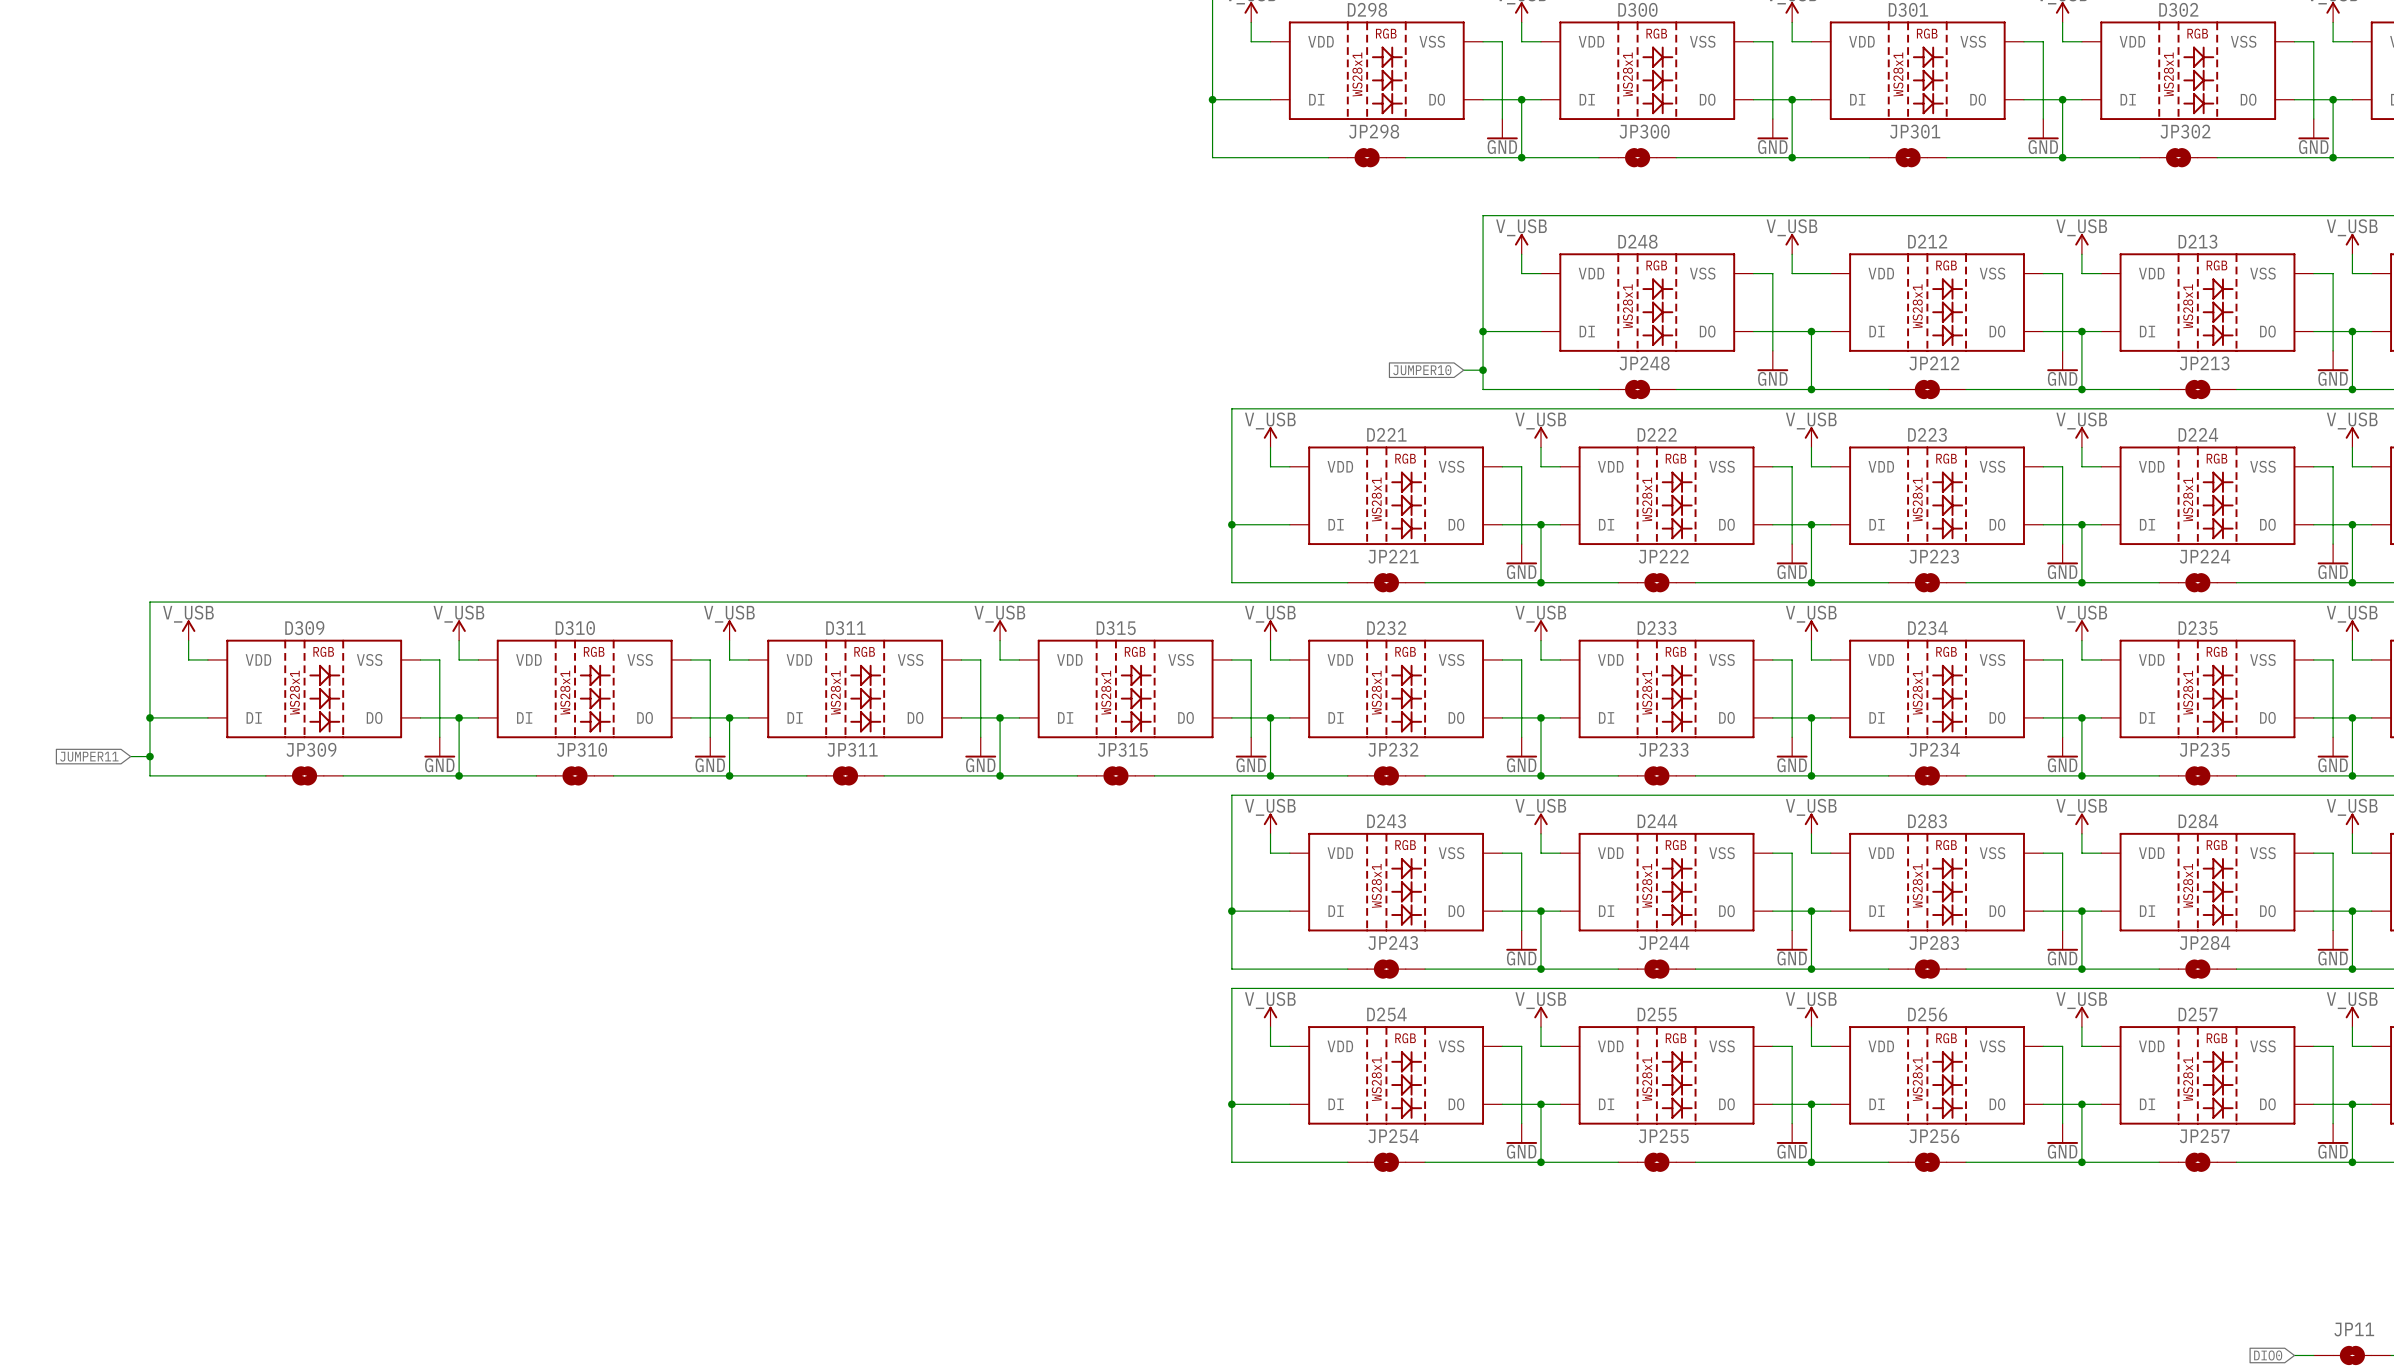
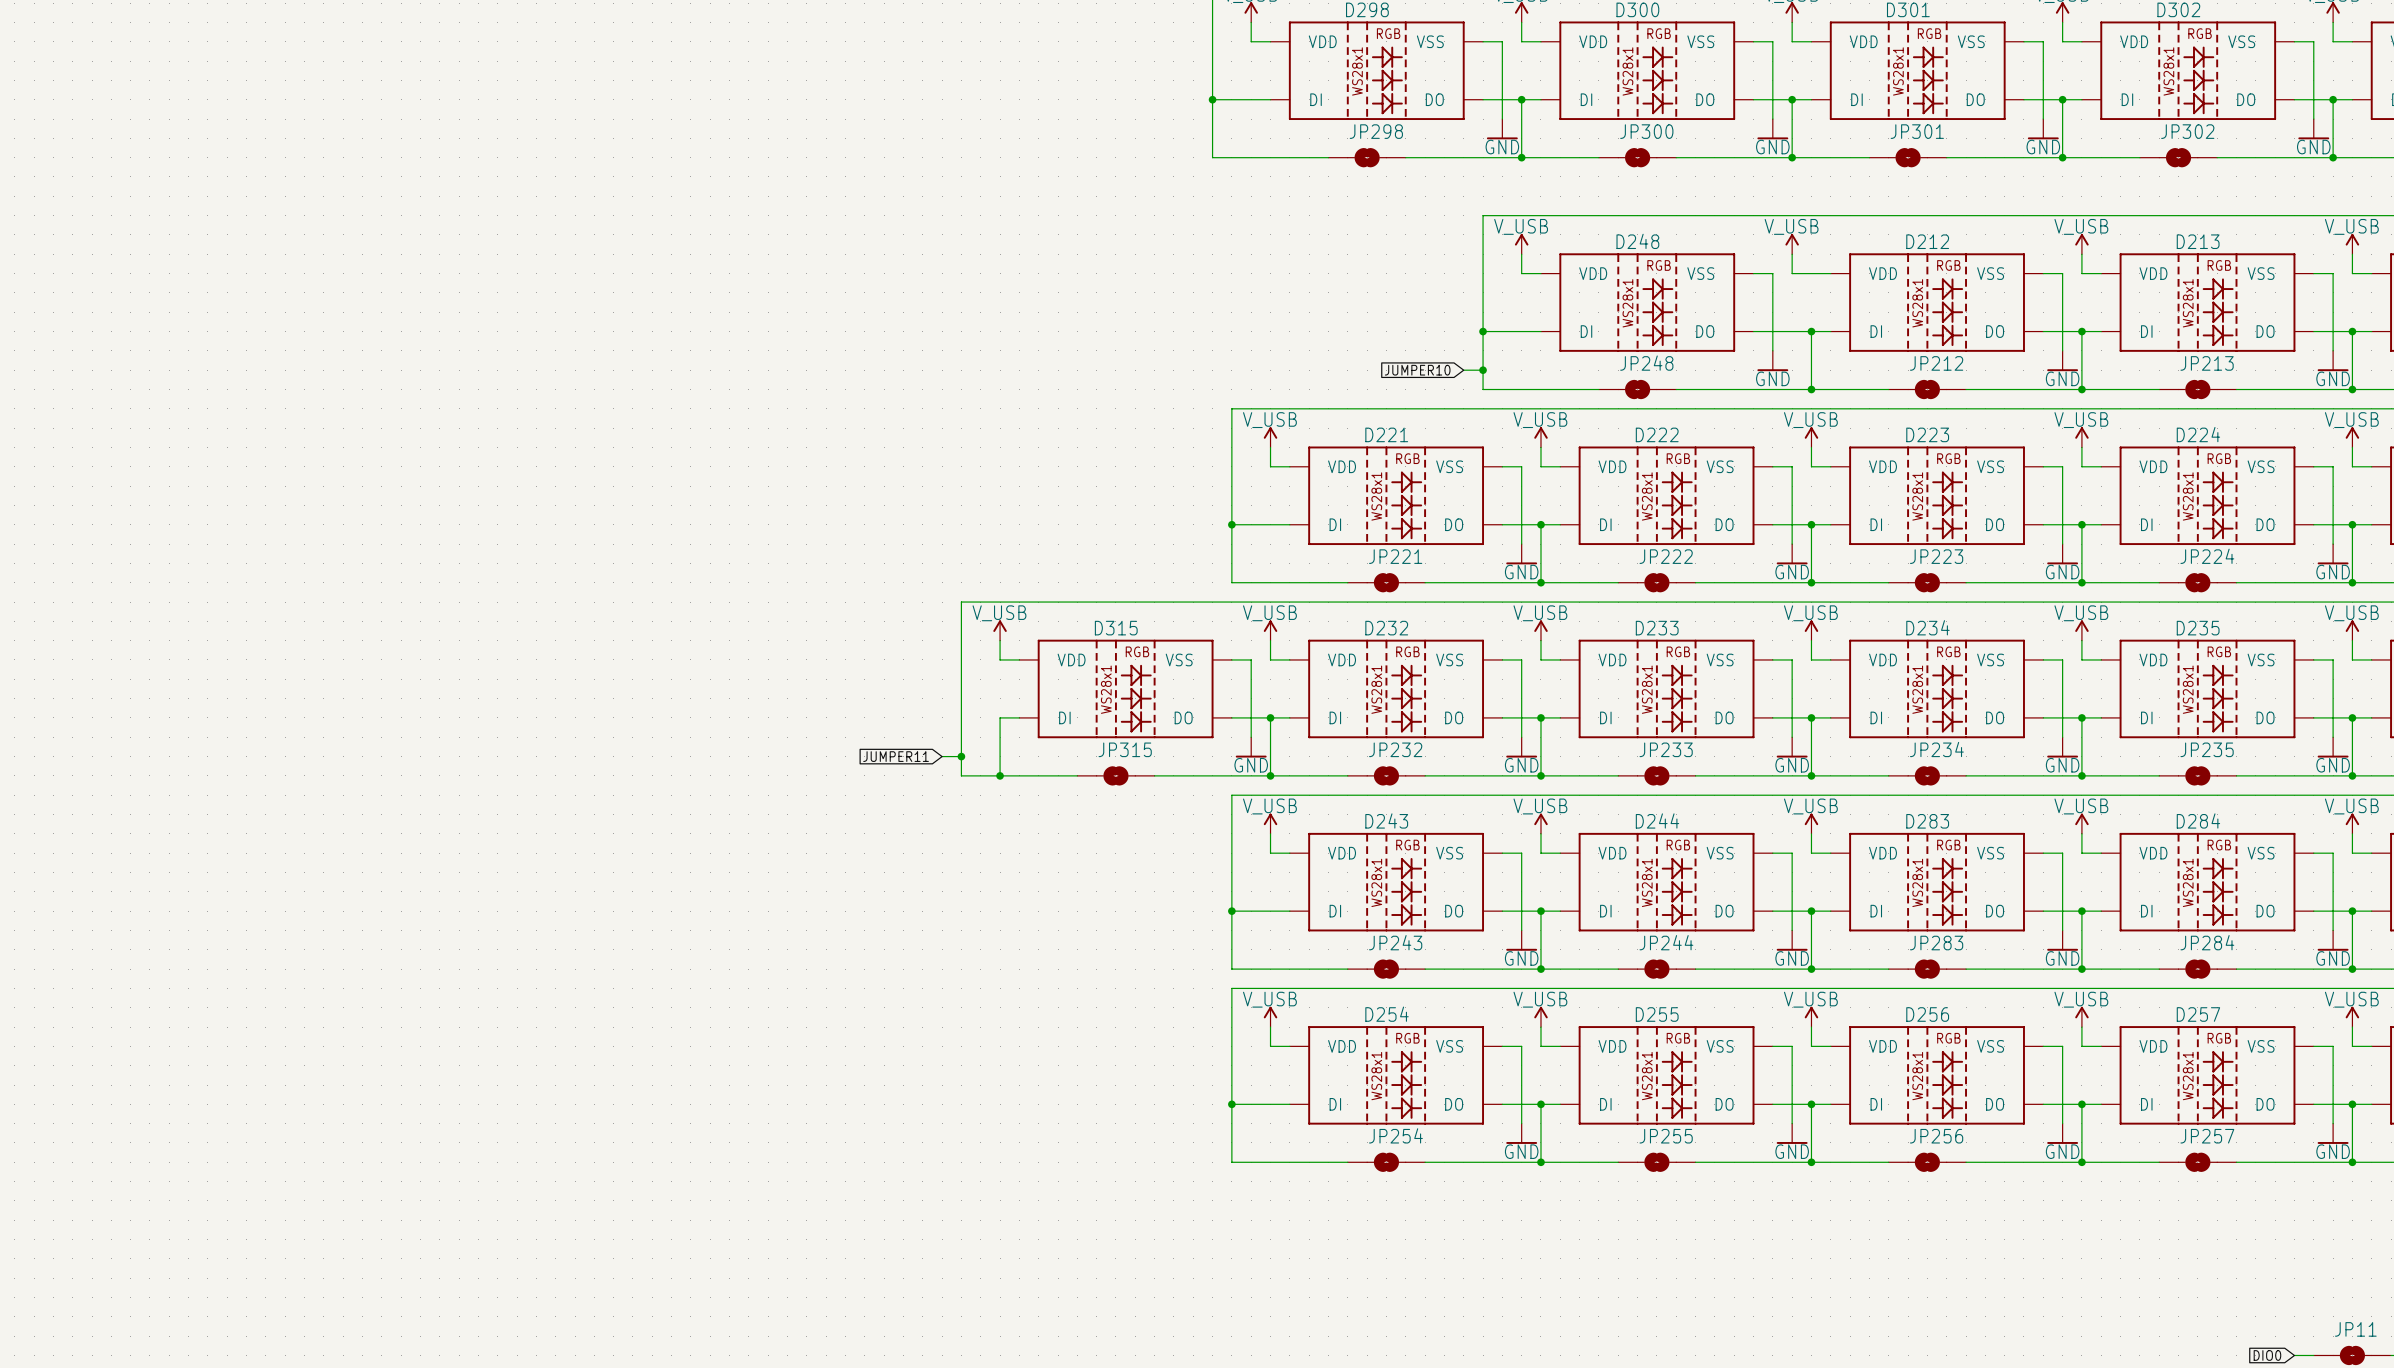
wire: (961, 602) (149, 602) (149, 775) (265, 775) -> none
power symbol: V_USB (188, 630) -> none
power symbol: V_USB (459, 630) -> none
power symbol: V_USB (729, 630) -> none
wire: (188, 640) (188, 659) (207, 659) -> none
wire: (459, 640) (459, 659) (478, 659) -> none
wire: (729, 640) (729, 659) (748, 659) -> none
wire: (420, 659) (439, 659) (439, 737) -> none
wire: (690, 659) (710, 659) (710, 737) -> none
wire: (961, 659) (980, 659) (980, 737) -> none
D309: (314, 688) -> none
D310: (584, 688) -> none
D311: (855, 688) -> none
wire: (149, 717) (207, 717) -> none
junction: (149, 717) -> none
wire: (420, 717) (478, 717) -> none
wire: (459, 717) (459, 775) -> none
junction: (459, 717) -> none
wire: (690, 717) (748, 717) -> none
wire: (729, 717) (729, 775) -> none
junction: (729, 717) -> none
wire: (961, 717) (1000, 717) -> none
junction: (1000, 717) -> none
power symbol: GND (439, 747) -> none
power symbol: GND (710, 747) -> none
power symbol: GND (980, 747) -> none
global label: JUMPER11 (89, 756) -> none
wire: (130, 756) (149, 756) -> none
junction: (149, 756) -> none
global label: none -> JUMPER11 (896, 756)
wire: none -> (942, 756) (961, 756)
junction: none -> (961, 756)
JP309: (304, 775) -> none
wire: (343, 775) (536, 775) -> none
junction: (459, 775) -> none
JP310: (575, 775) -> none
wire: (613, 775) (806, 775) -> none
junction: (729, 775) -> none
JP311: (845, 775) -> none
wire: (884, 775) (961, 775) -> (961, 602) (961, 775)

